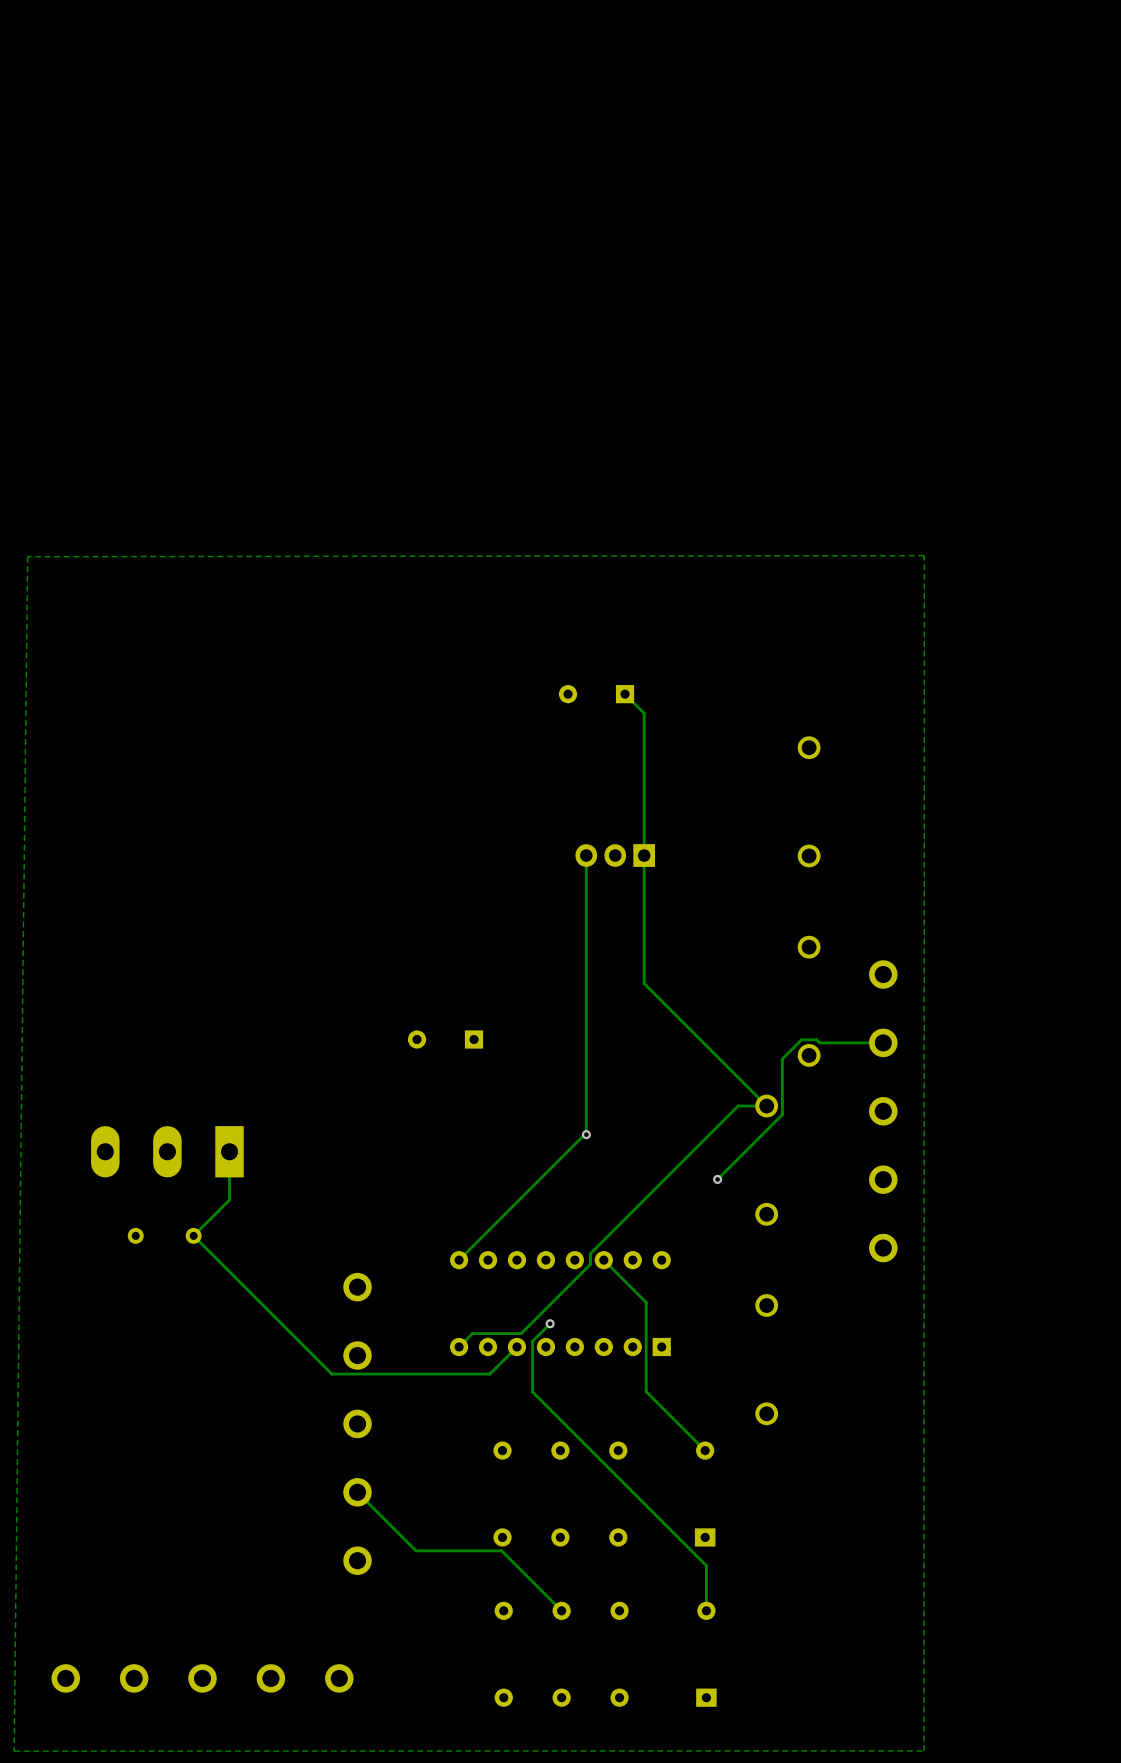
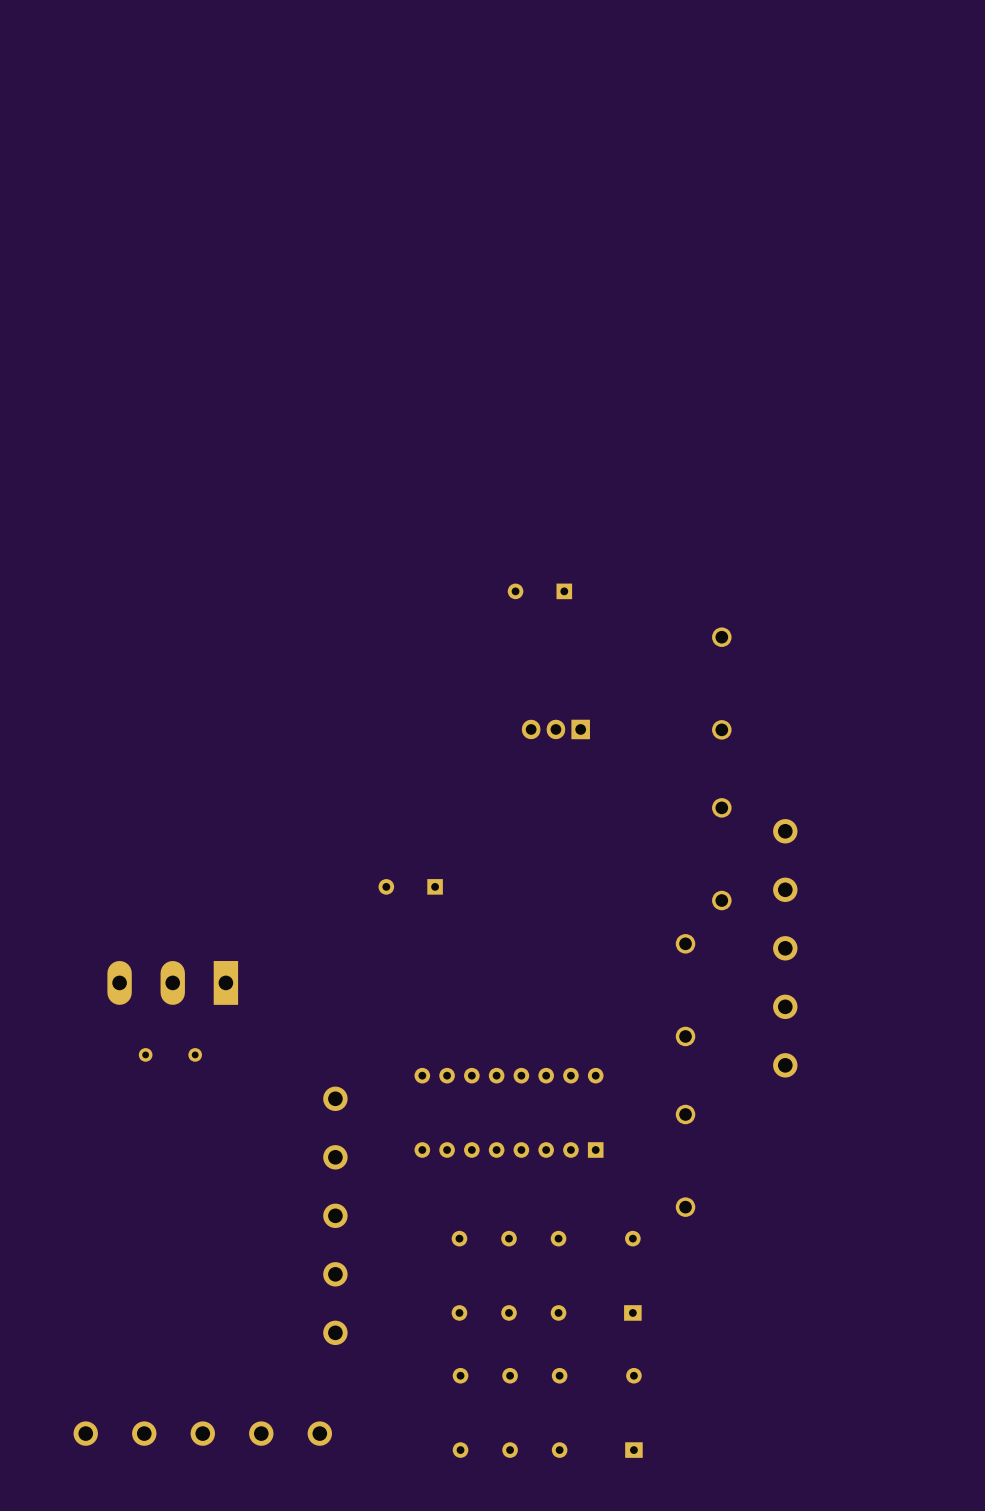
zone outline: (924, 555) (924, 1750) (14, 1751) (27, 556) (924, 555) -> none
track: (625, 694) (644, 713) (644, 983) (766, 1106) (738, 1106) (590, 1253) (590, 1264) (521, 1333) (472, 1333) (459, 1346) -> none
track: (586, 855) (586, 1132) (459, 1260) -> none
track: (883, 1042) (819, 1042) (816, 1039) (801, 1039) (782, 1058) (782, 1114) (717, 1179) -> none
via: (586, 1134) -> none
track: (229, 1151) (229, 1199) (193, 1235) (331, 1374) (489, 1374) (516, 1346) -> none
via: (717, 1179) -> none
track: (603, 1260) (646, 1302) (646, 1391) (705, 1450) -> none
track: (550, 1323) (532, 1341) (532, 1391) (706, 1565) (706, 1610) -> none
via: (550, 1323) -> none
track: (357, 1492) (416, 1550) (501, 1550) (561, 1610) -> none

